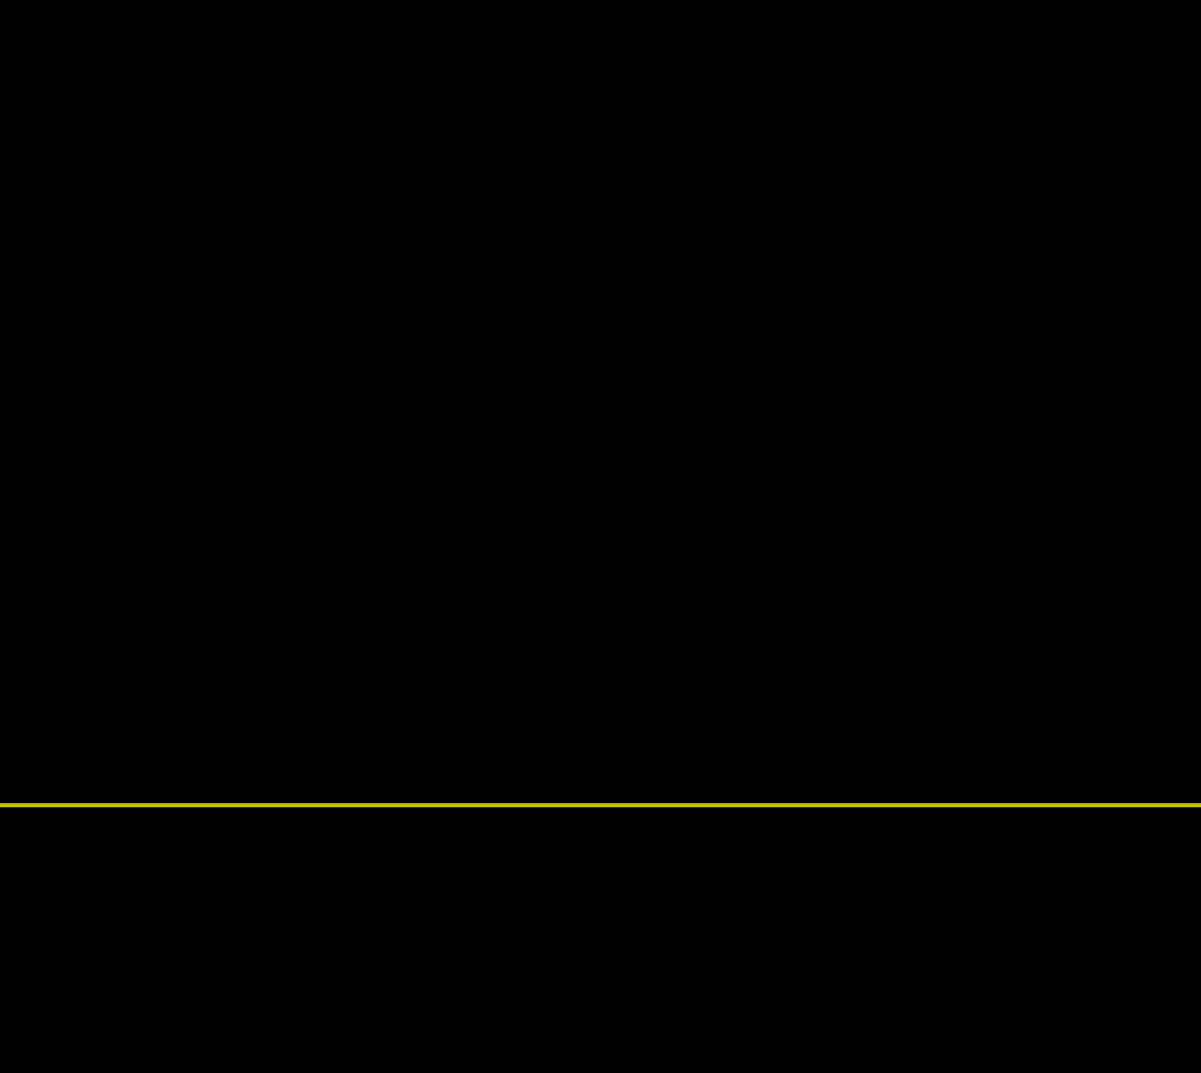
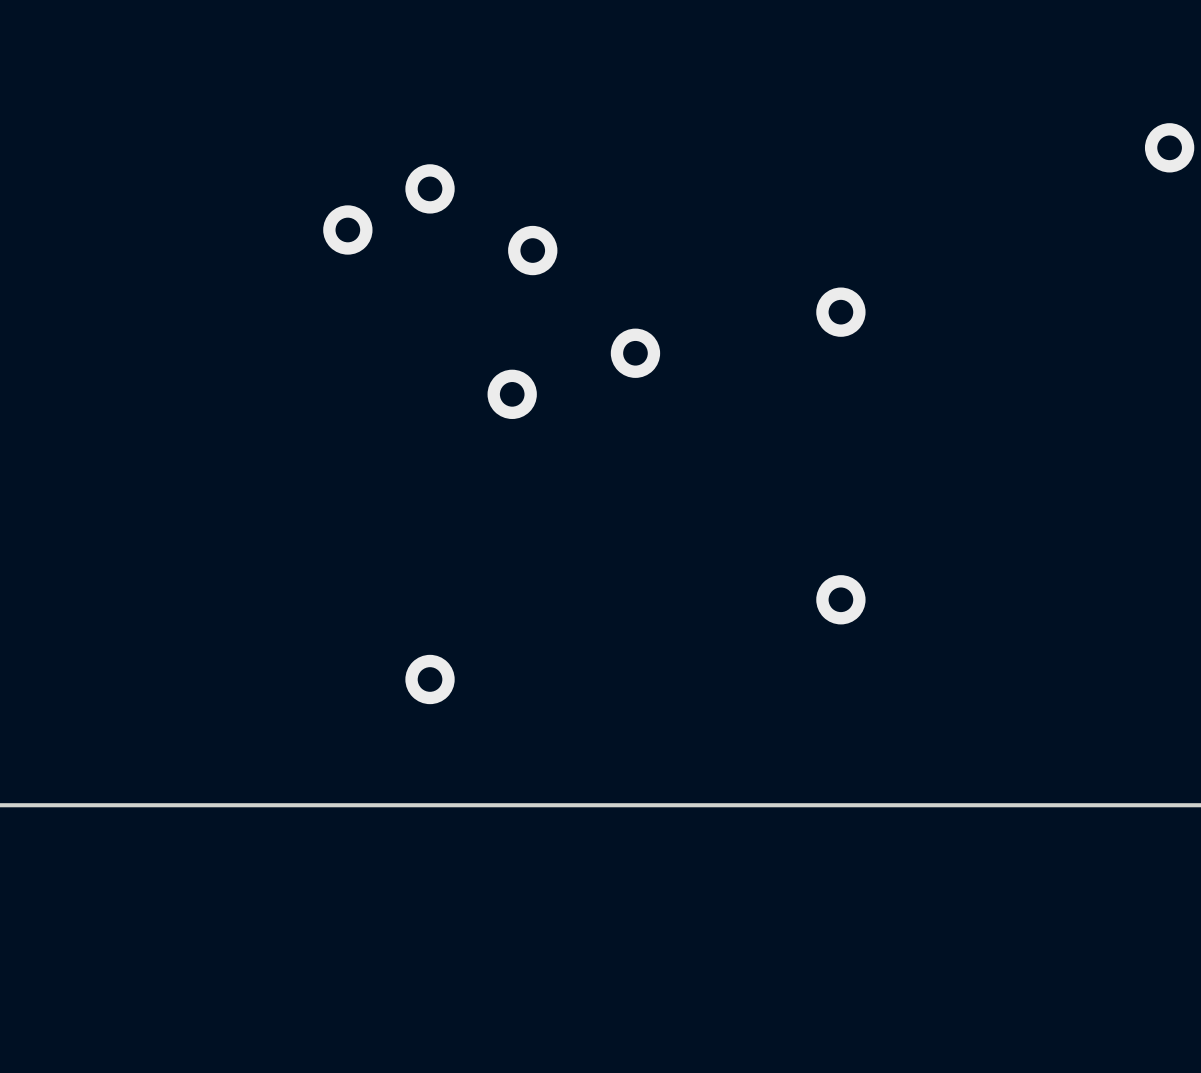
via: none -> (1169, 147)
via: none -> (430, 188)
via: none -> (347, 229)
via: none -> (532, 250)
via: none -> (840, 312)
via: none -> (635, 353)
via: none -> (512, 394)
via: none -> (840, 599)
via: none -> (430, 679)

